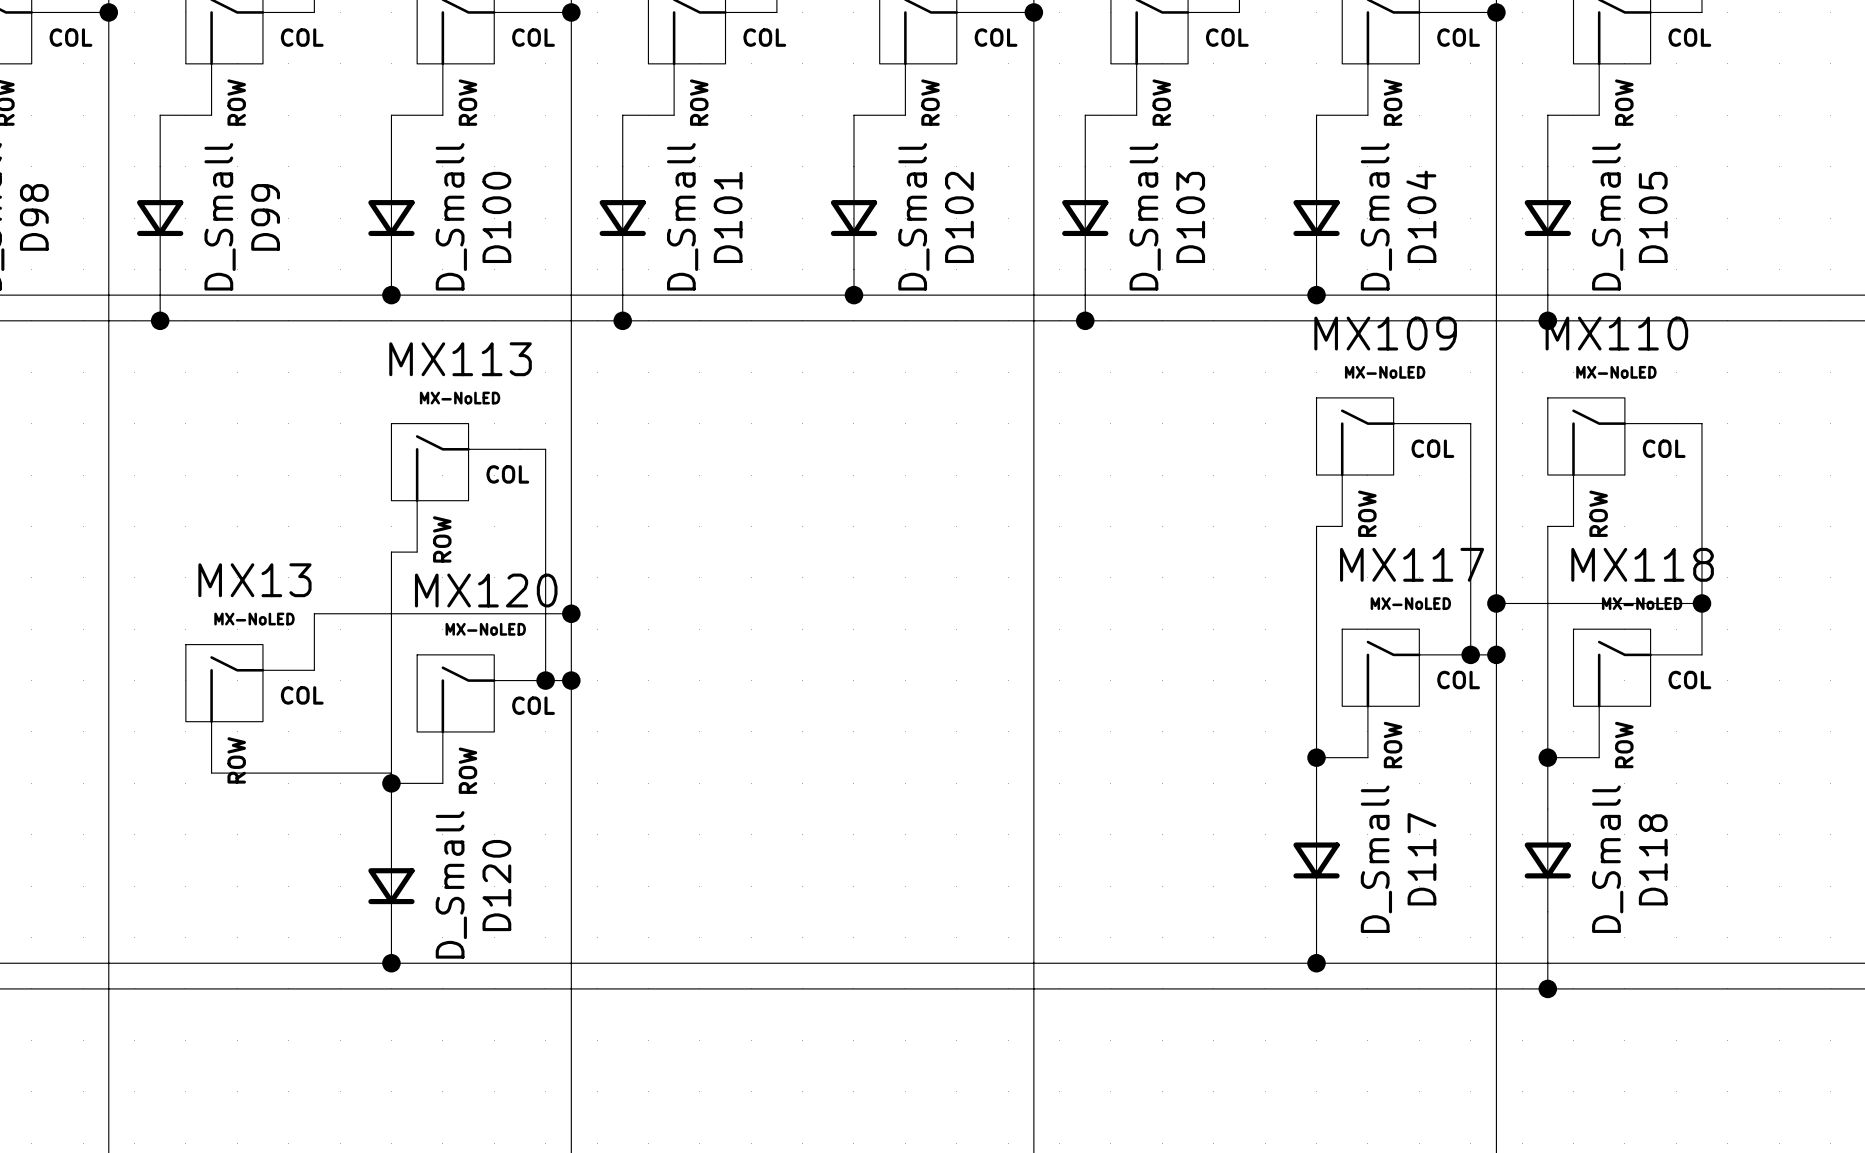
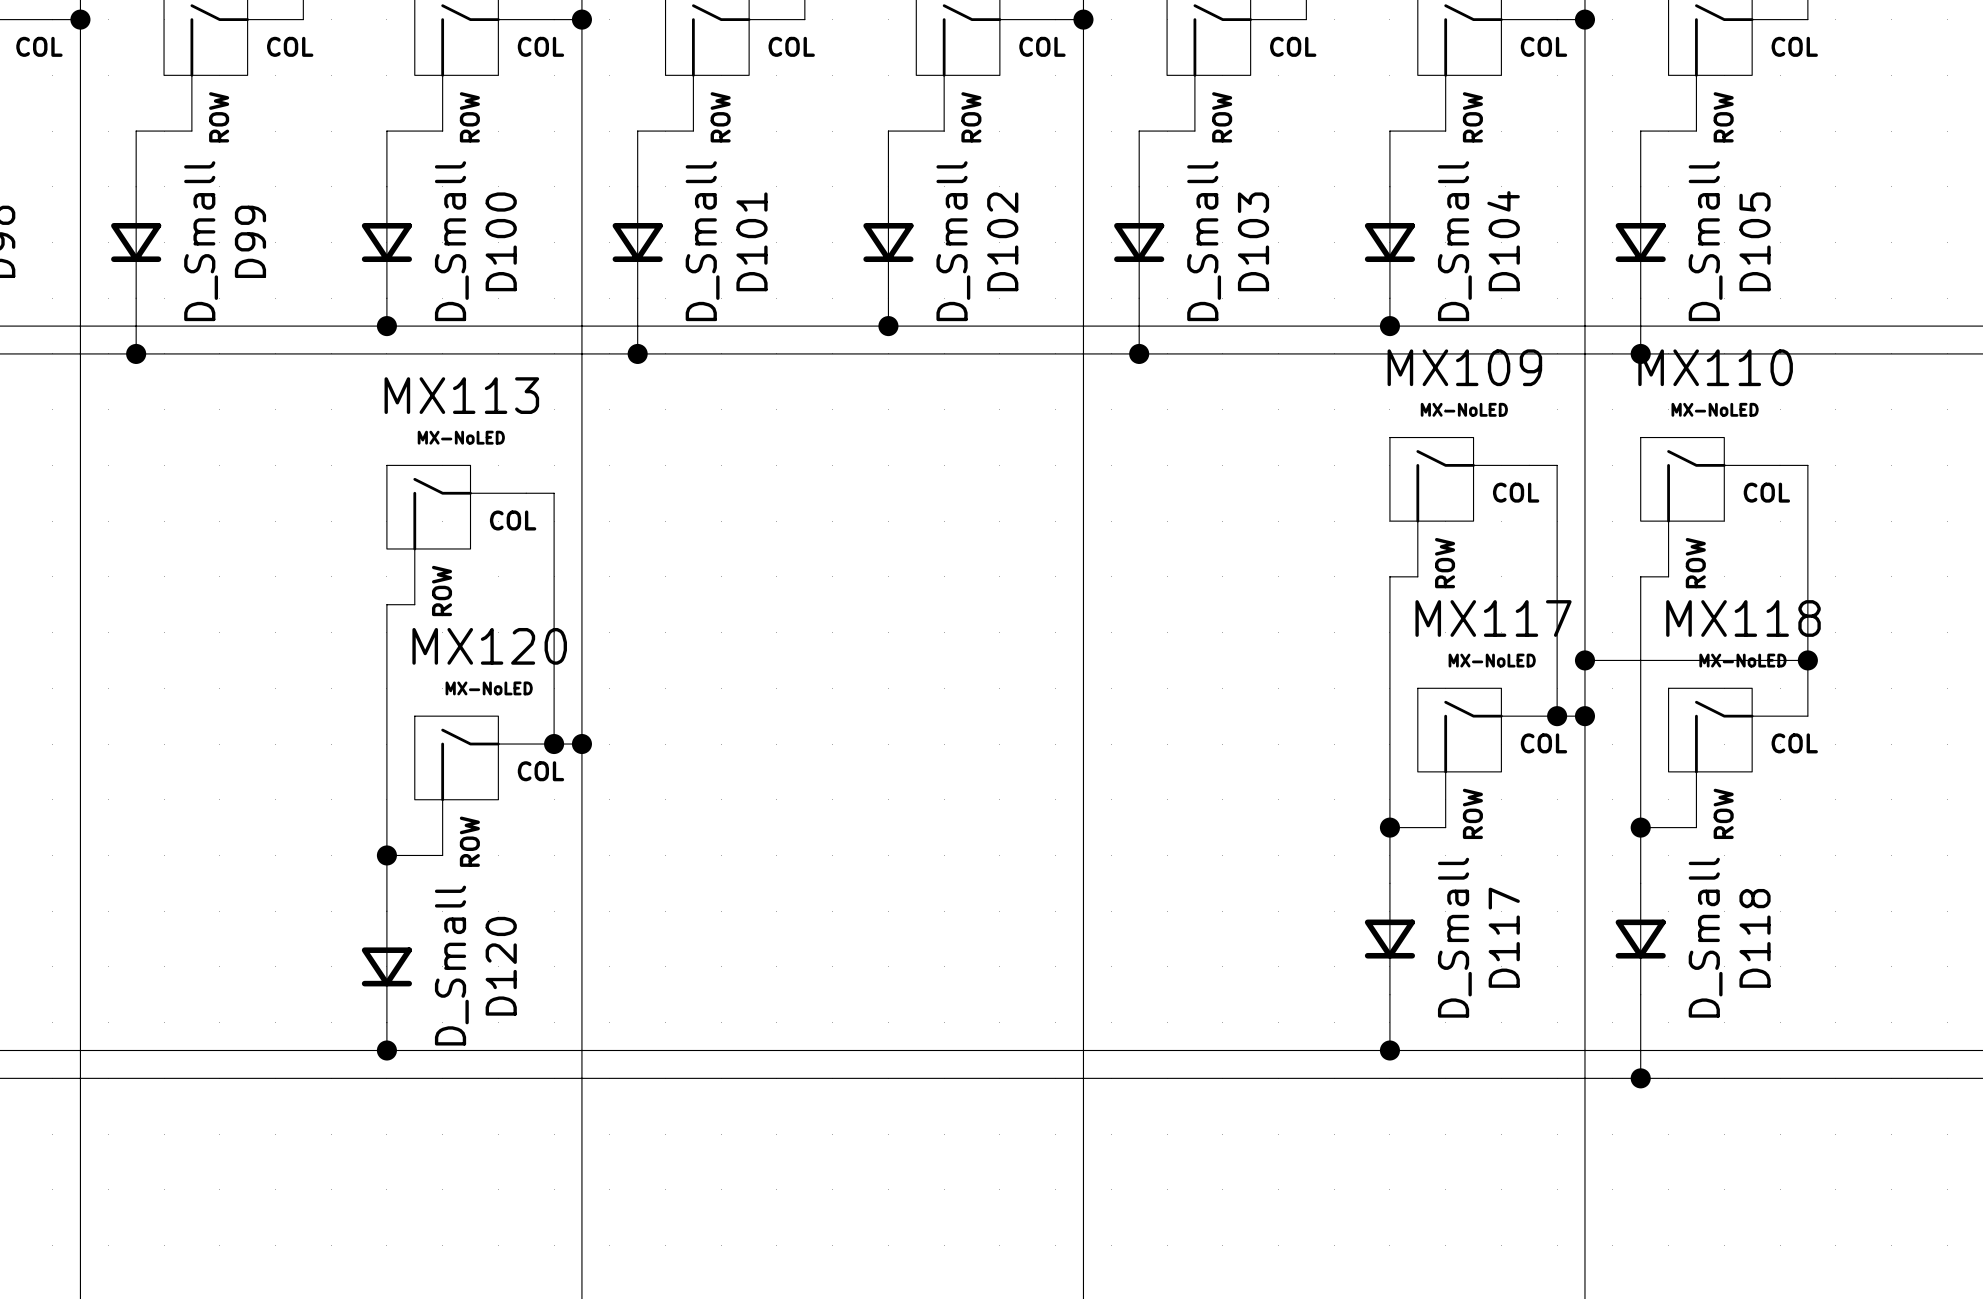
wire: (571, 613) (314, 613) (314, 670) -> none
junction: (571, 613) -> none
MX13: MX-NoLED (250, 708) -> none
wire: (211, 773) (391, 773) -> none

